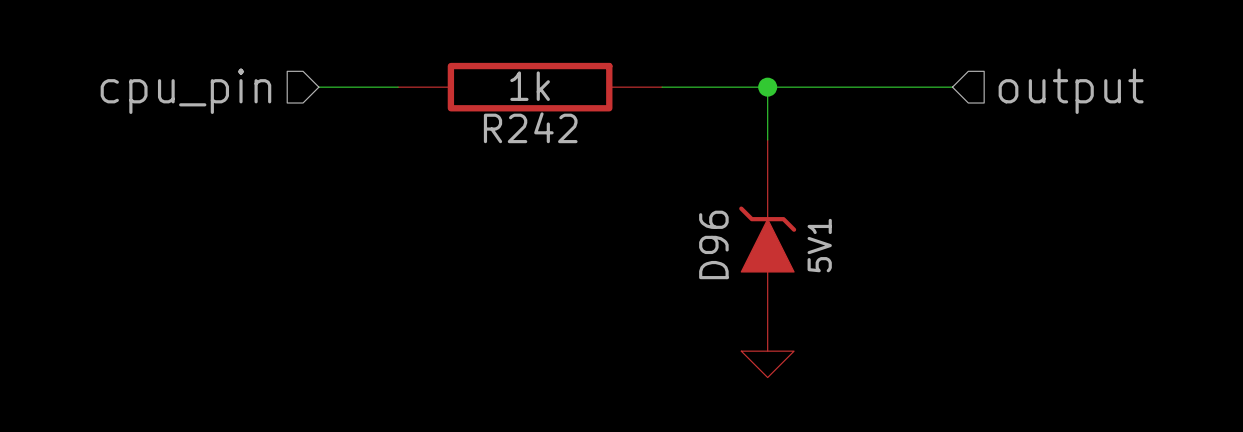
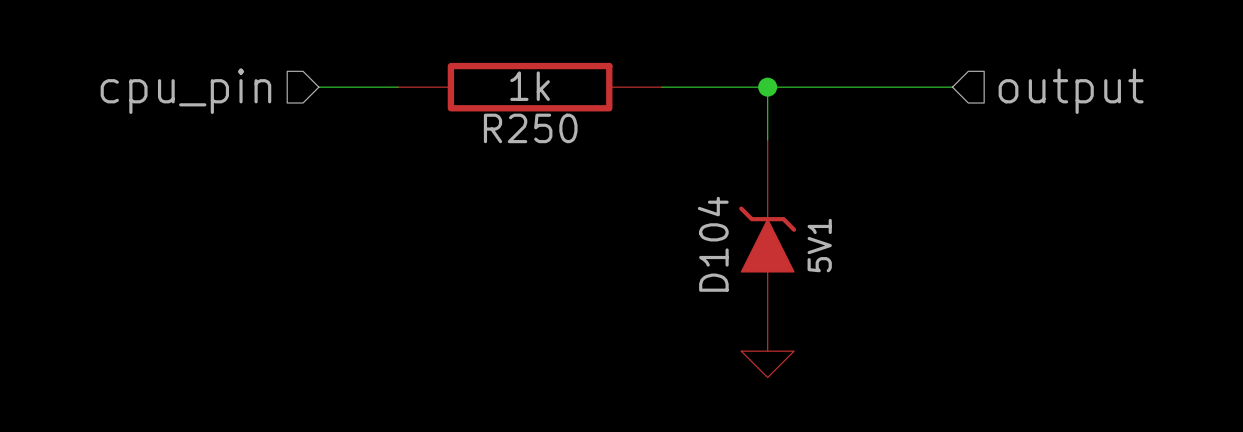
R242 name: R242 (530, 127) -> R250 (530, 128)
D96 name: D96 (713, 244) -> D104 (713, 244)

